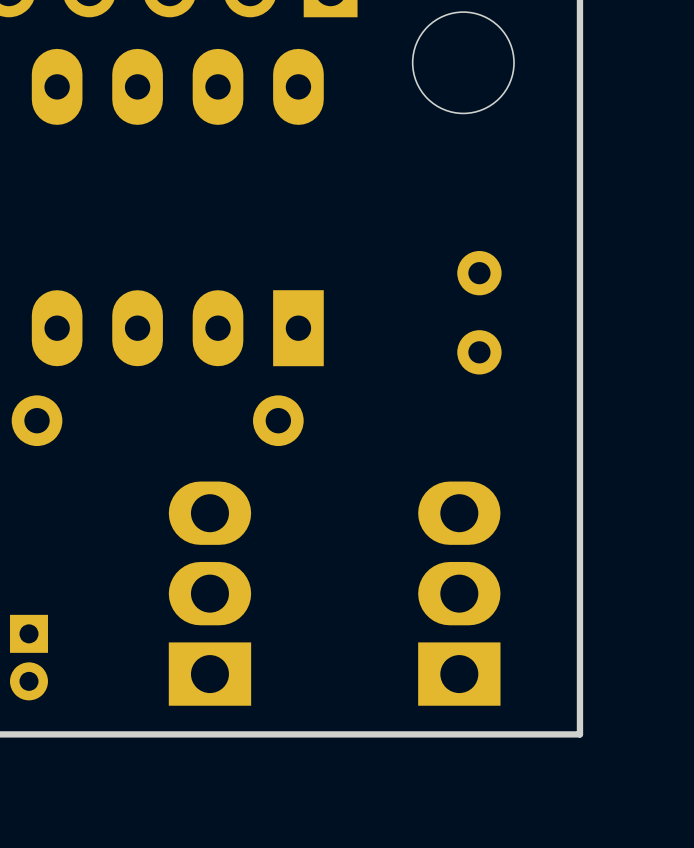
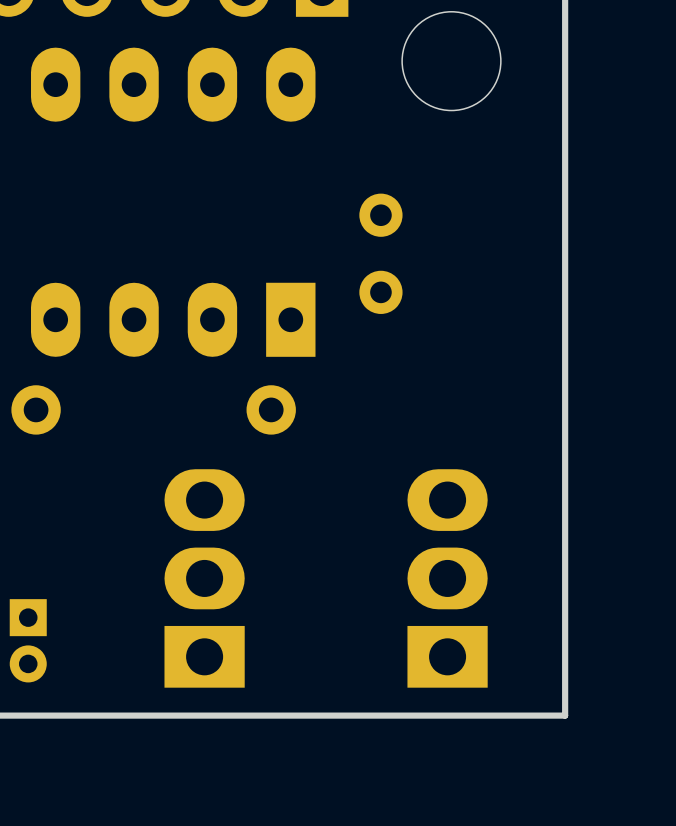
part position: (479, 312) -> (380, 253)

